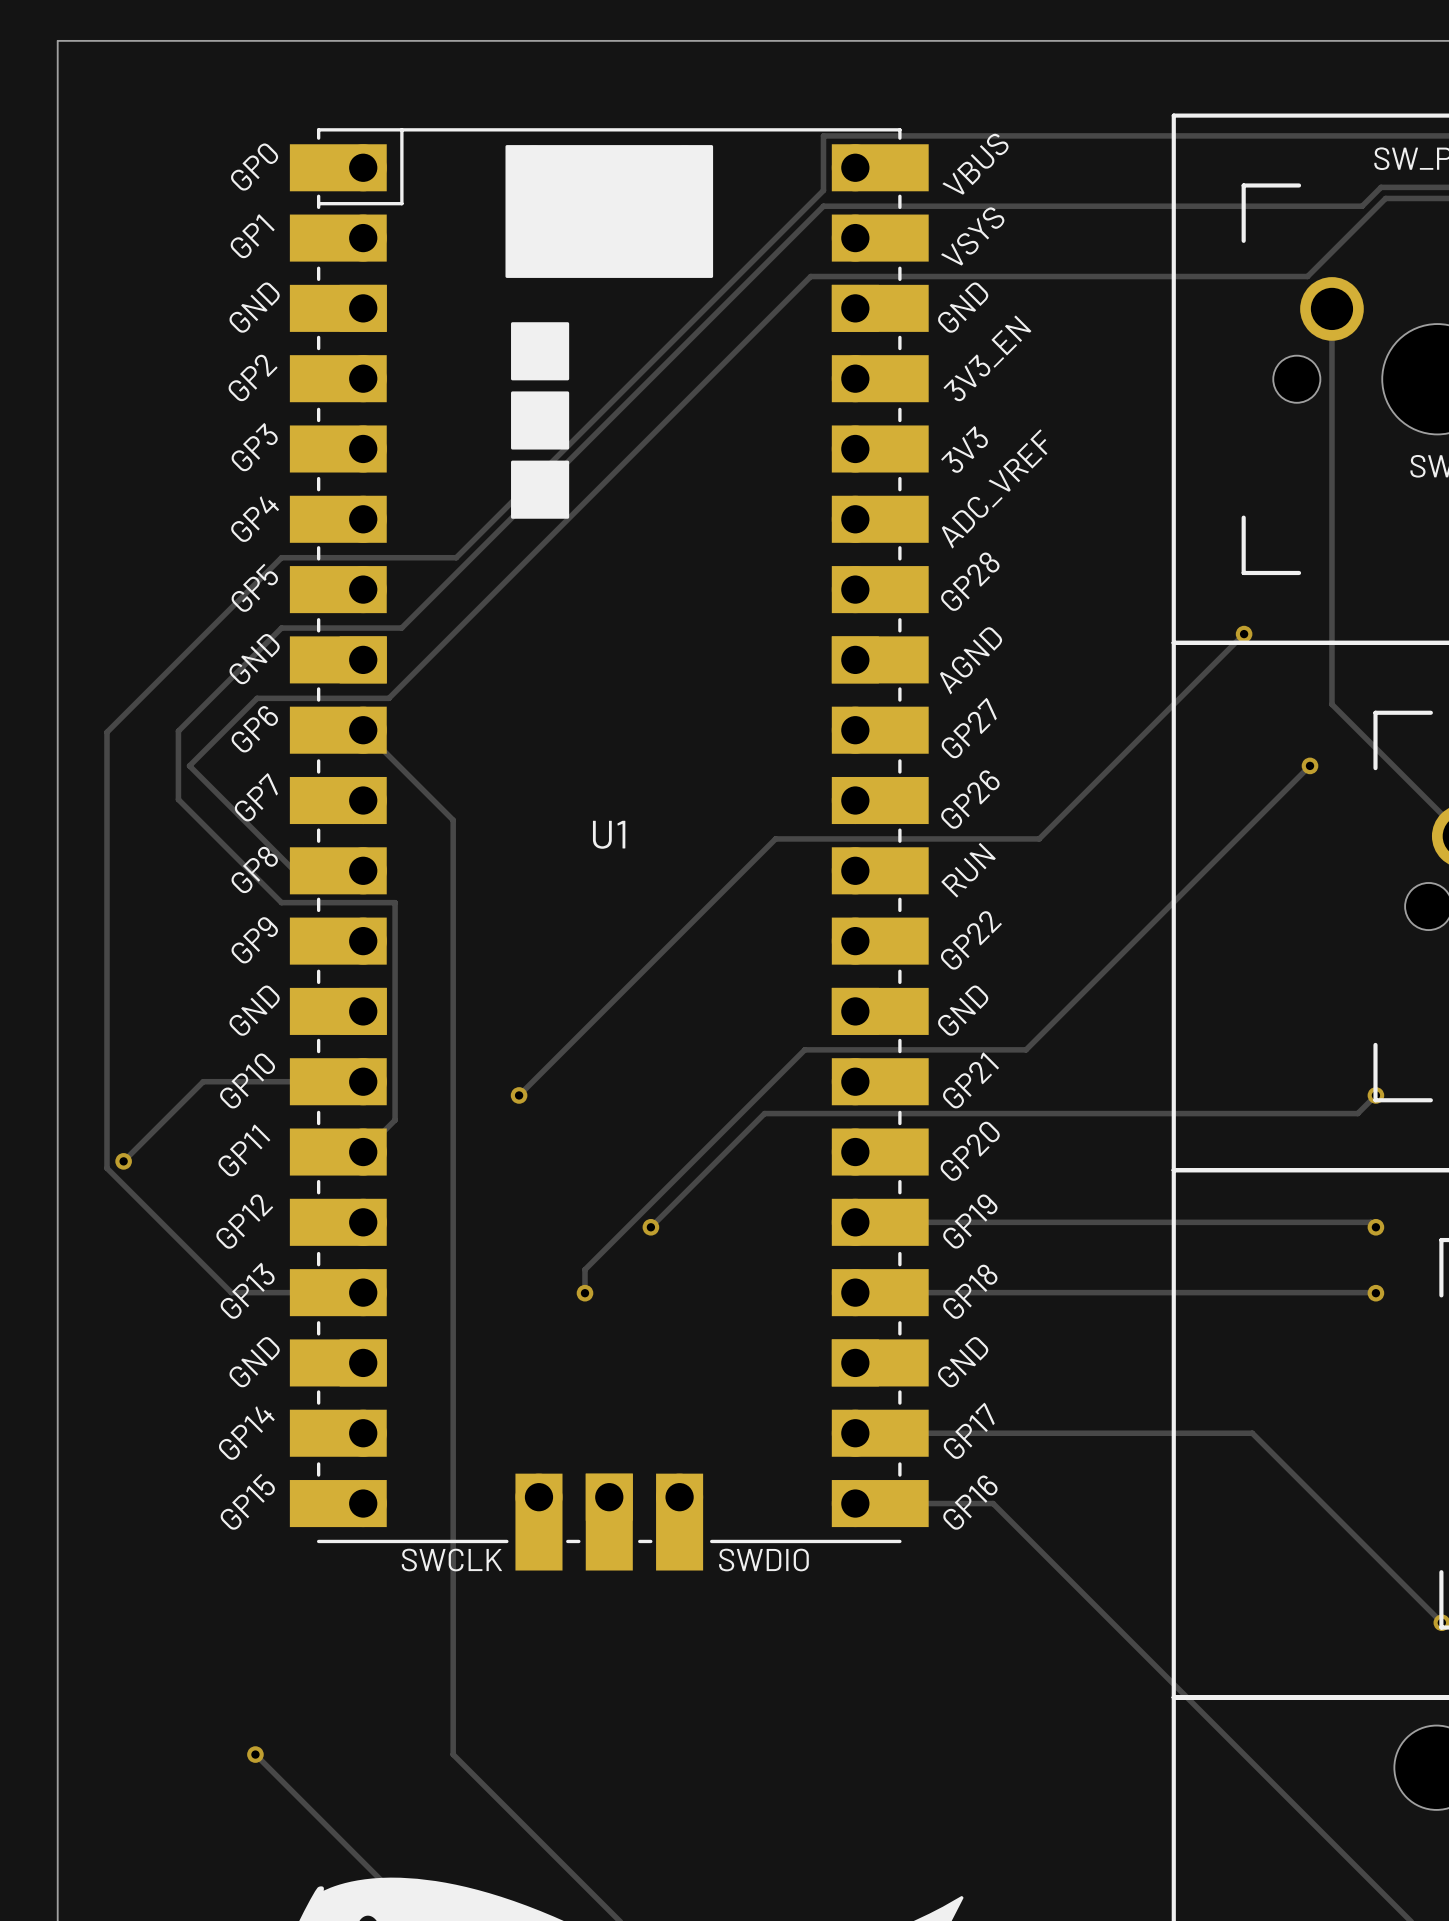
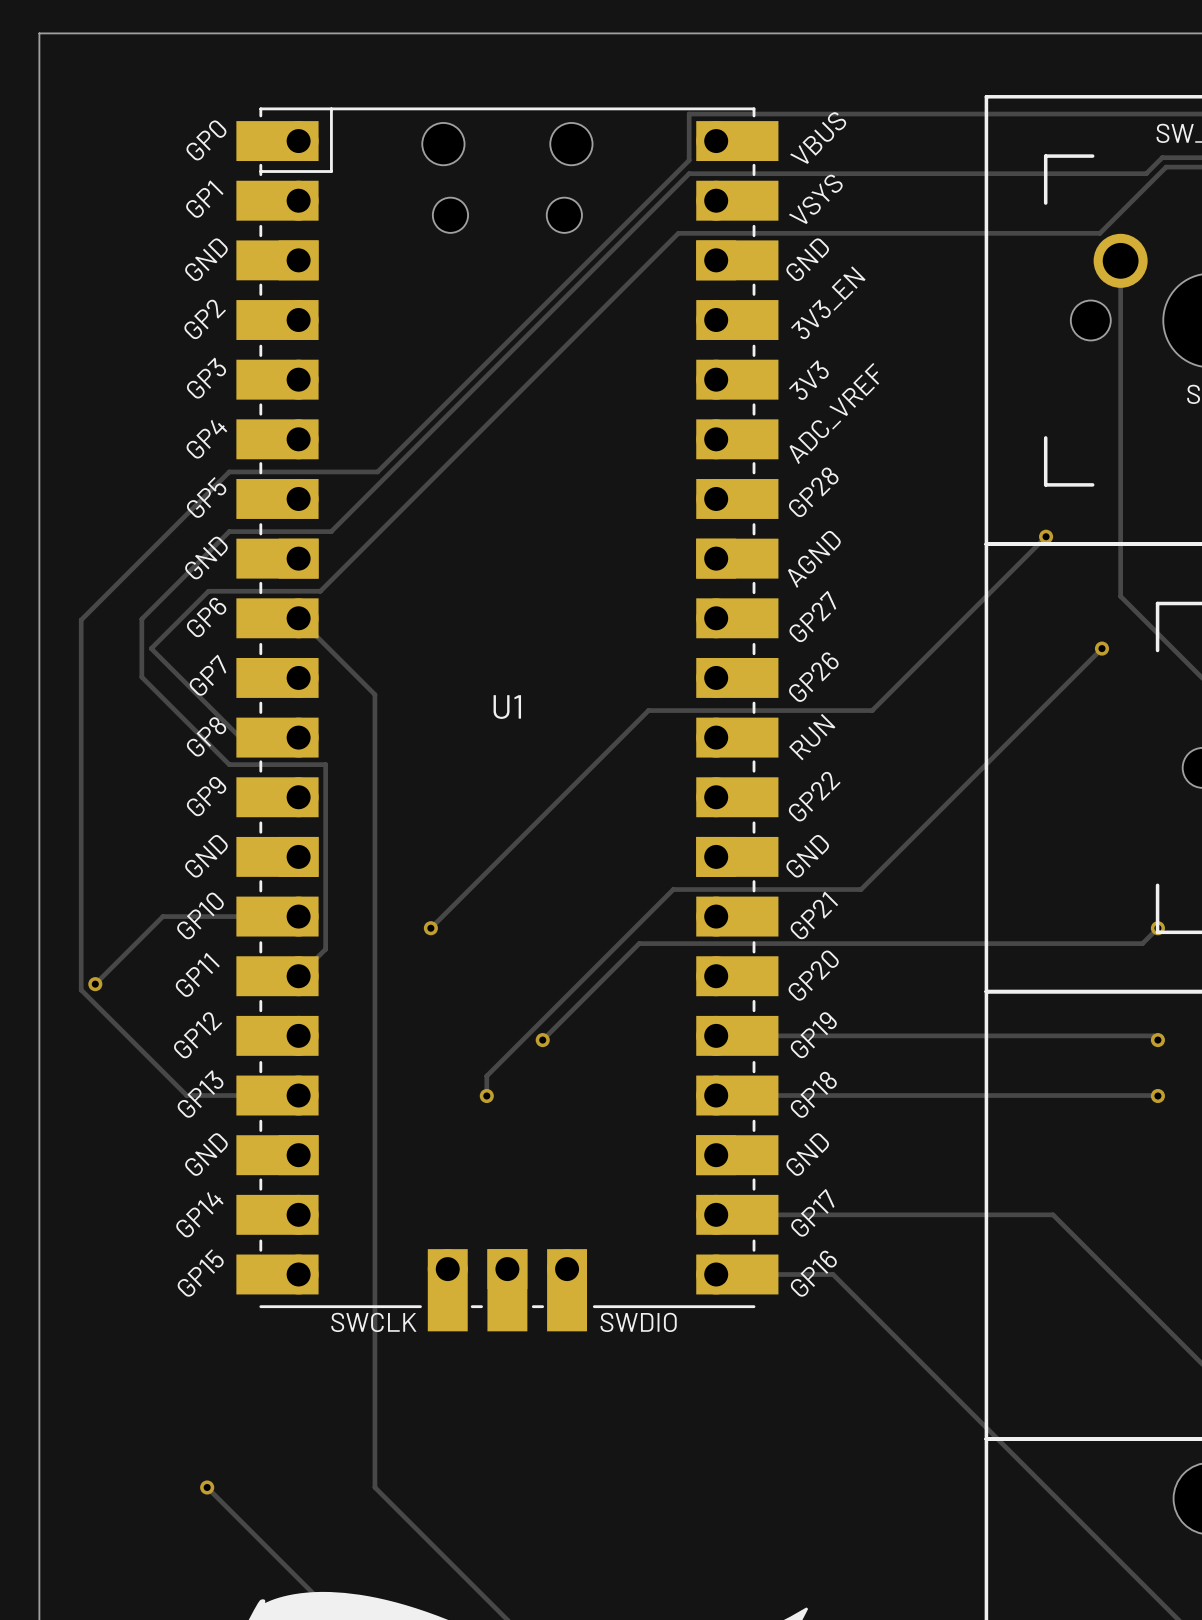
U1 footprint: [289, 128, 929, 1571] -> [236, 107, 779, 1332]

